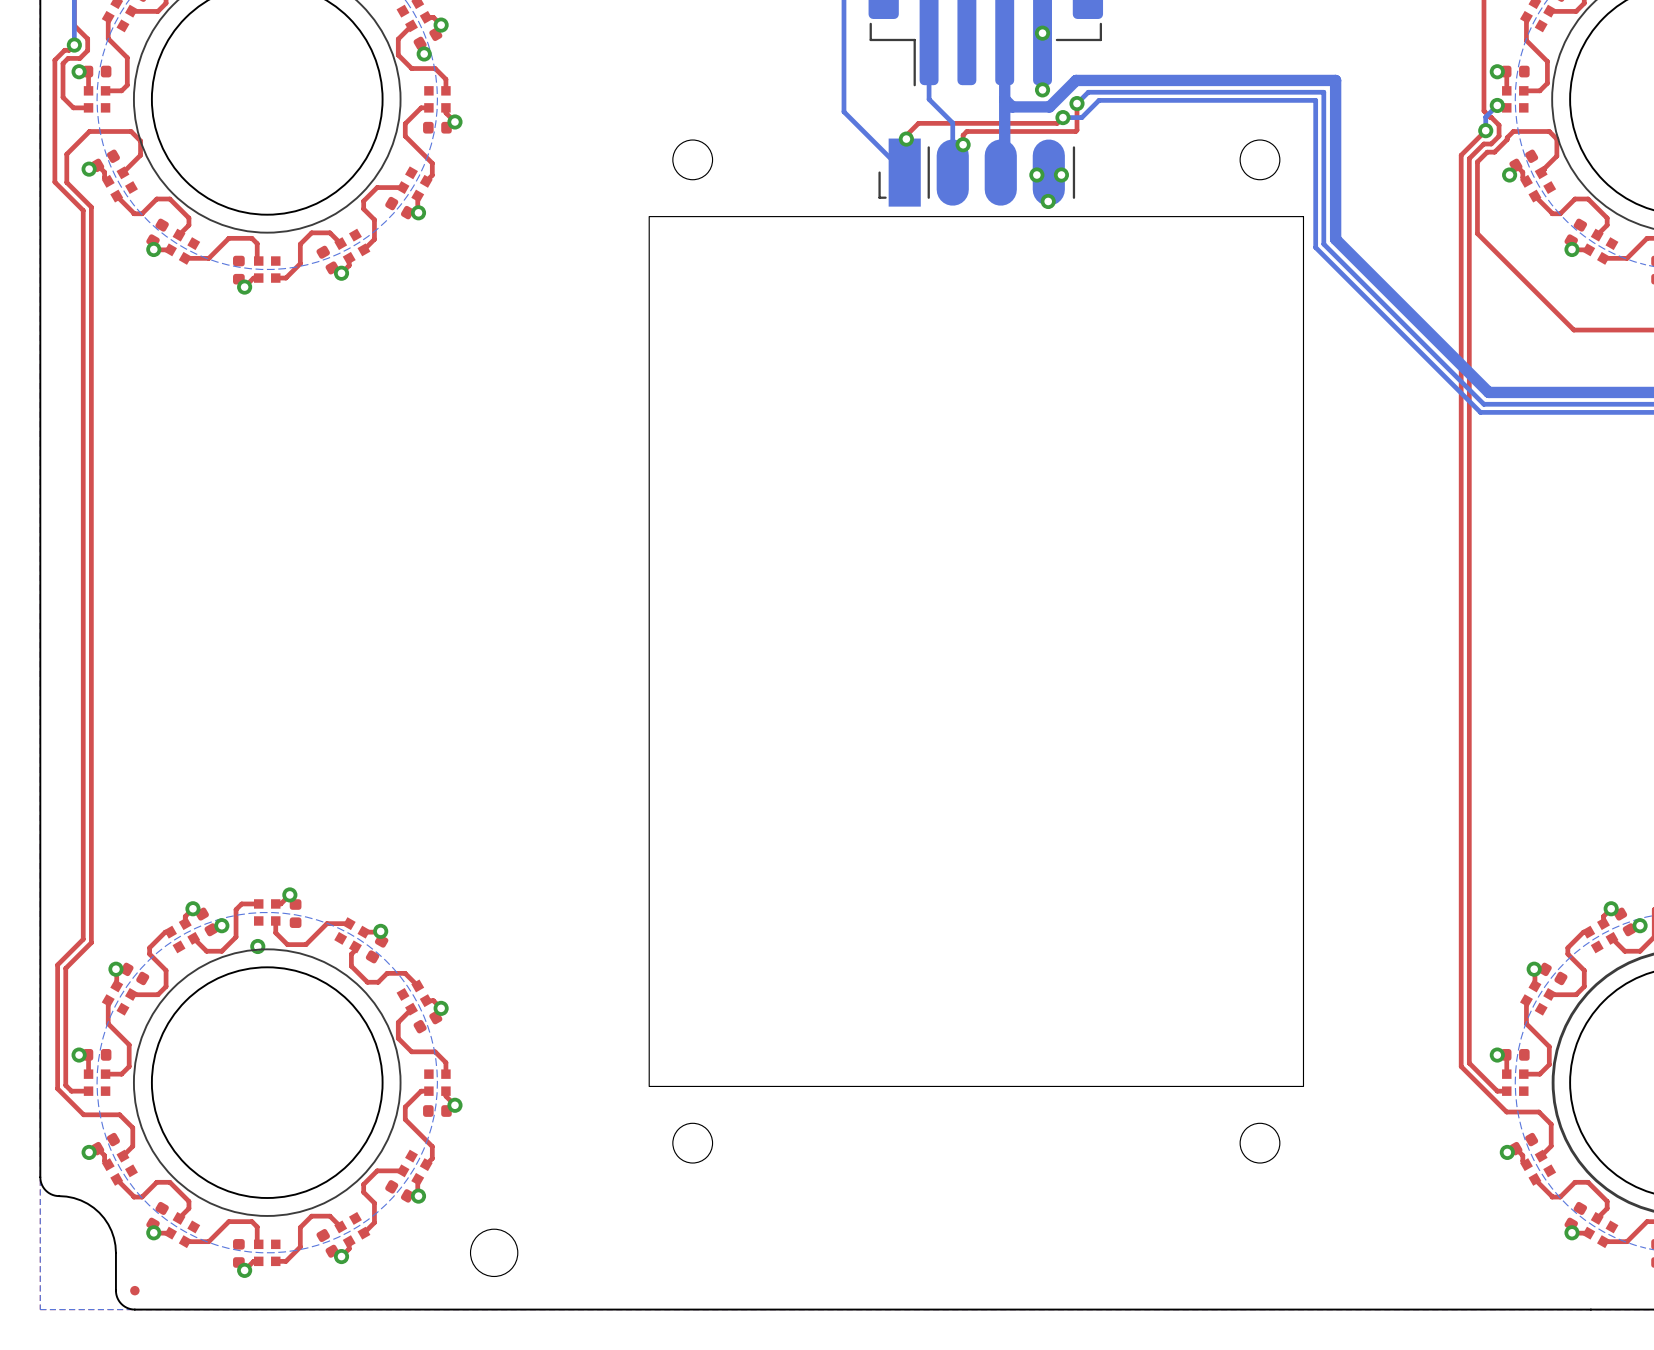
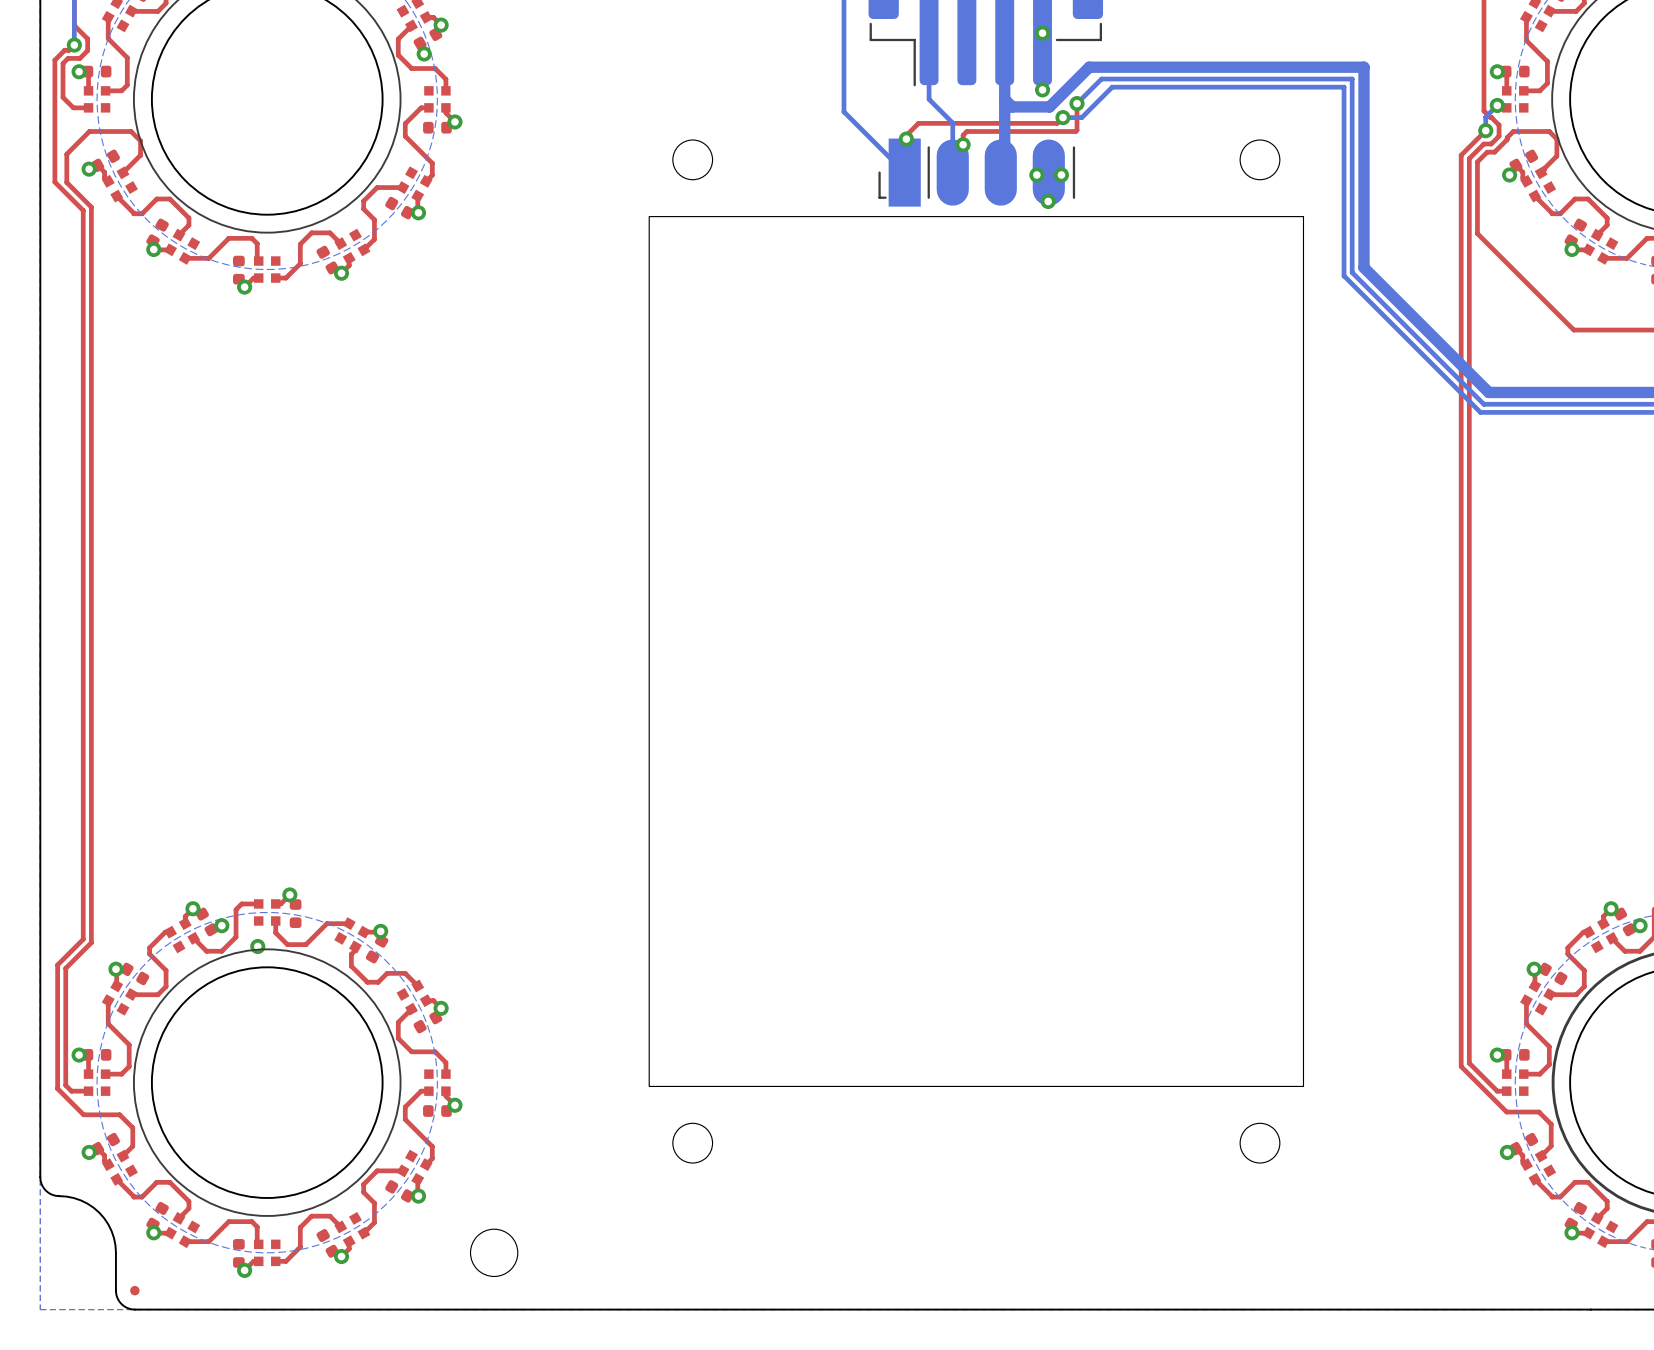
bottom track: (1076, 80) (1335, 80) (1335, 239) (1363, 267) -> (1076, 80) (1089, 67) (1363, 67) (1363, 267)
bottom track: (1088, 92) (1323, 92) (1323, 244) (1352, 272) -> (1088, 92) (1101, 79) (1352, 79) (1352, 272)
bottom track: (1099, 100) (1315, 100) (1315, 247) (1344, 275) -> (1099, 100) (1112, 87) (1344, 87) (1344, 275)

